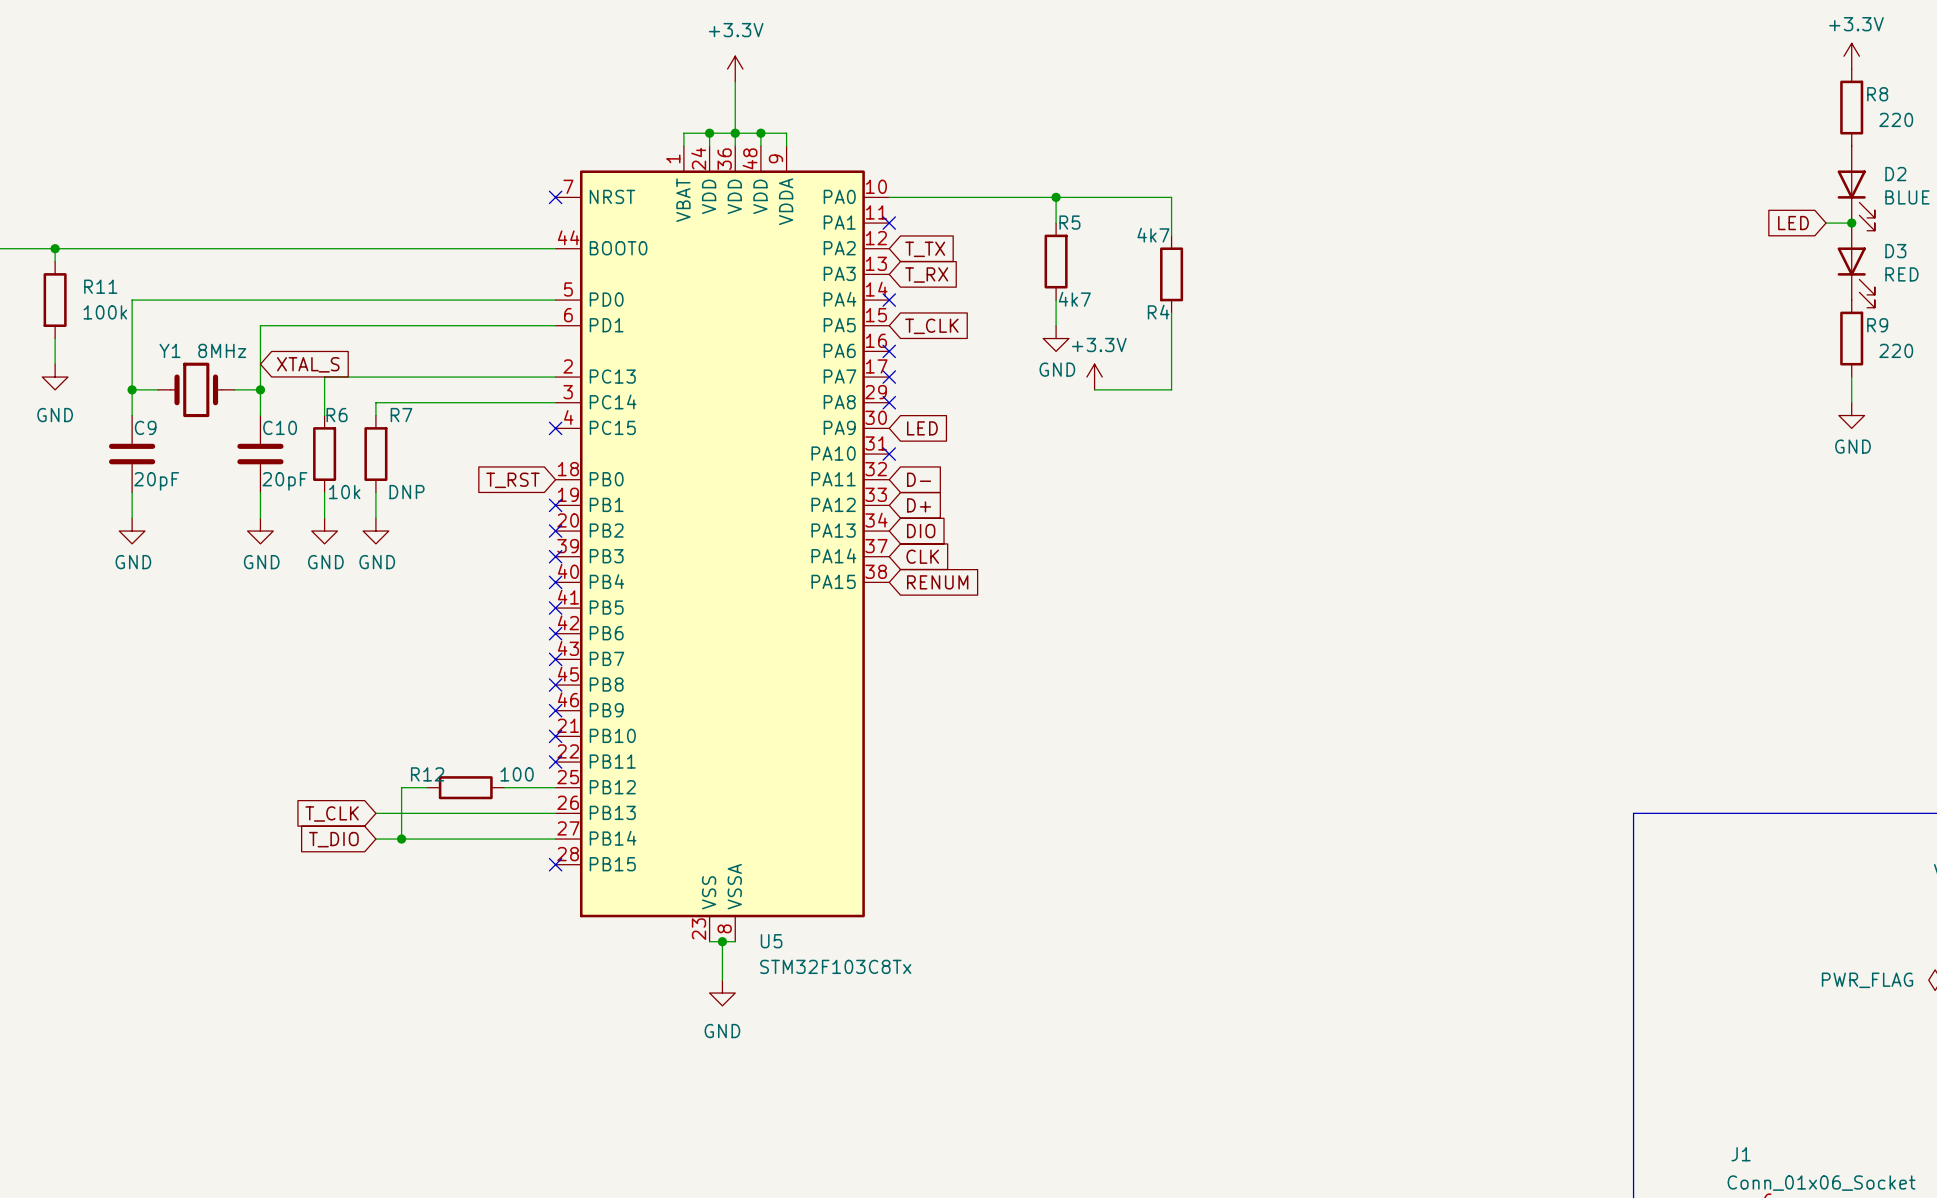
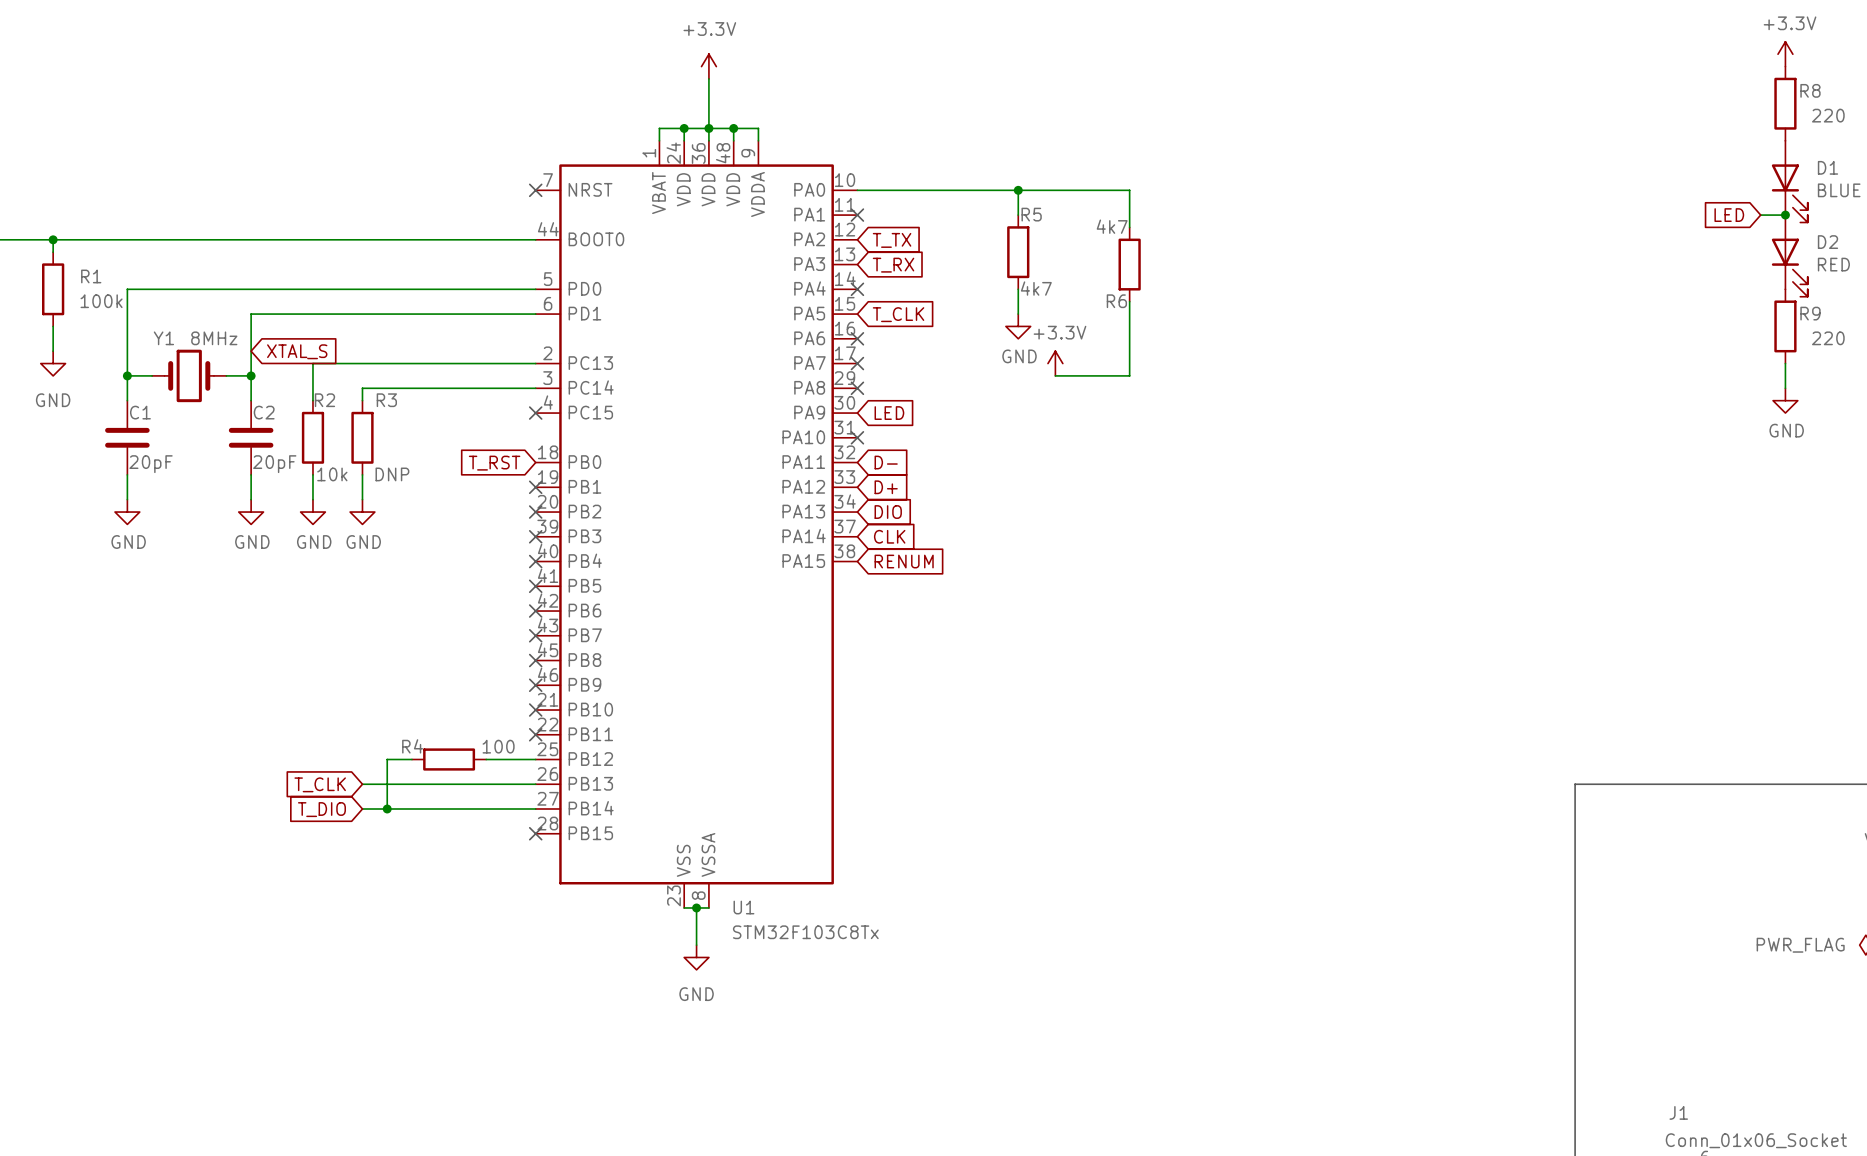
D2 name: D2 (1895, 174) -> D1 (1827, 167)
D3 name: D3 (1895, 251) -> D2 (1827, 242)
R11 name: R11 (100, 286) -> R1 (91, 276)
R4 name: R4 (1158, 312) -> R6 (1116, 301)
R6 name: R6 (337, 415) -> R2 (324, 400)
R7 name: R7 (401, 415) -> R3 (386, 400)
C9 name: C9 (145, 427) -> C1 (140, 412)
C10 name: C10 (280, 427) -> C2 (264, 412)
R12 name: R12 (427, 774) -> R4 (412, 746)
U5 name: U5 (771, 941) -> U1 (743, 907)

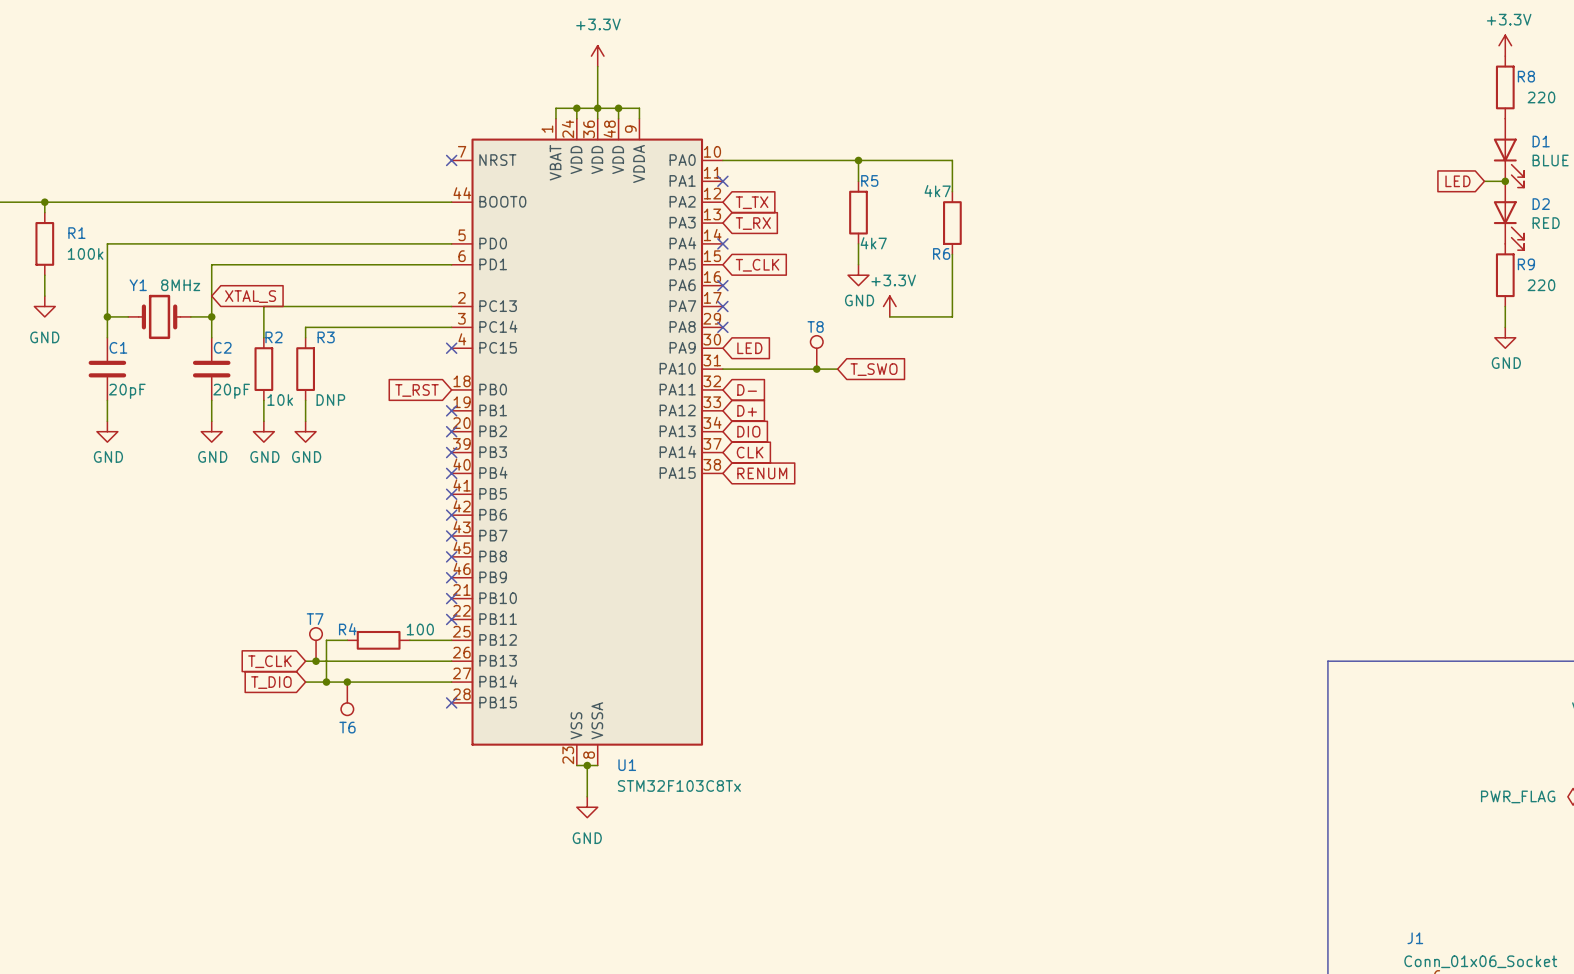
T8: none -> (816, 352)
wire: none -> (722, 369) (837, 369)
no-connect mark: (857, 437) -> none
junction: none -> (816, 369)
global label: none -> T_SWO (874, 369)
T7: none -> (316, 644)
junction: none -> (316, 661)
junction: none -> (347, 682)
T6: none -> (347, 698)

